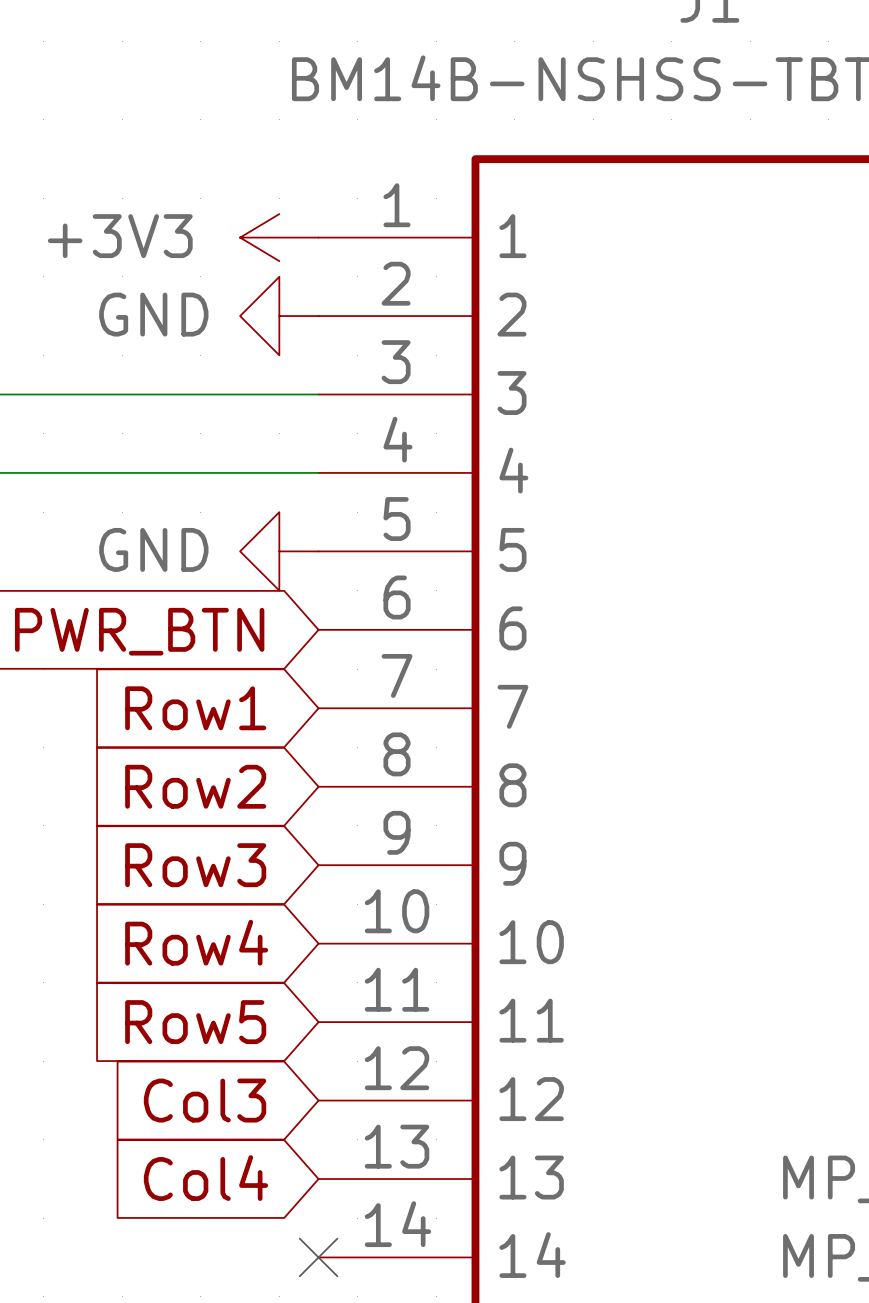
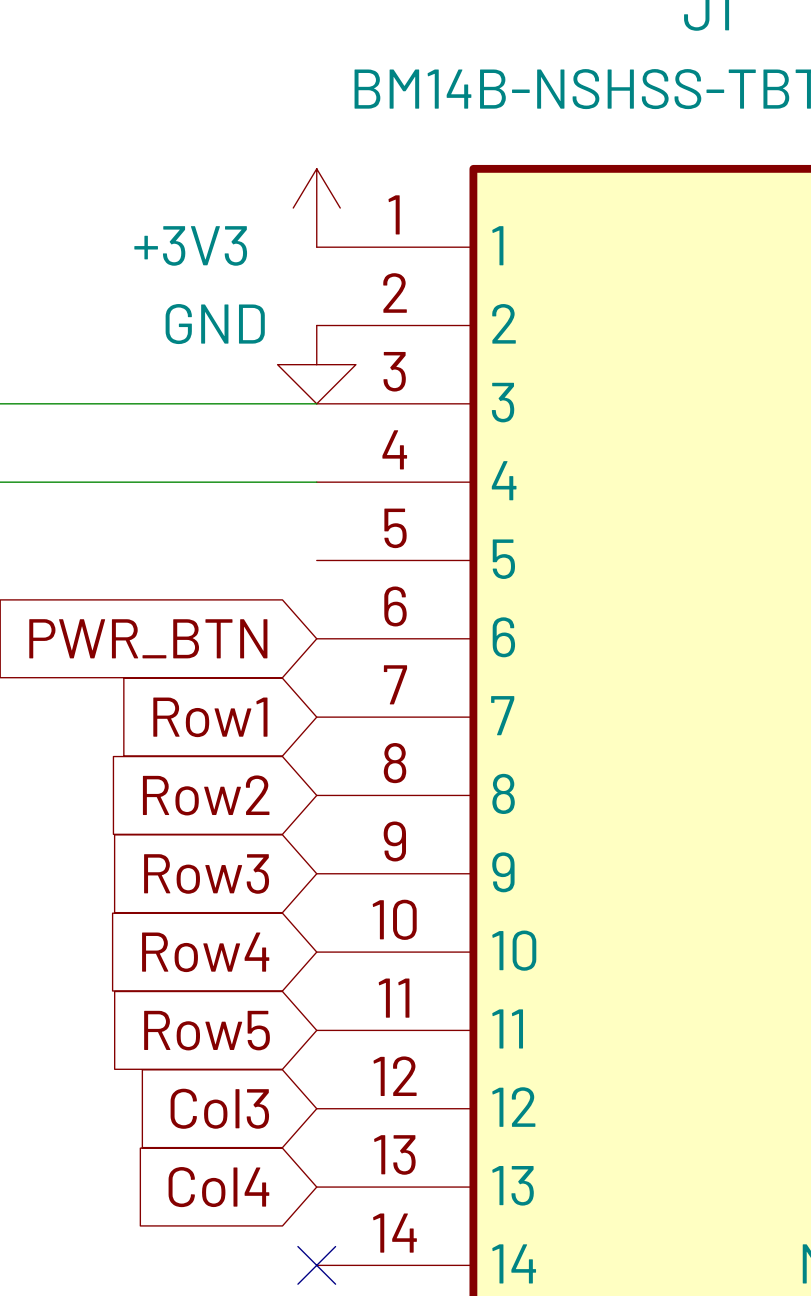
power symbol rotation: 0° (279, 237) -> 90° clockwise (316, 208)
power symbol position: +3V3 (279, 237) -> +3V3 (316, 208)
power symbol rotation: 0° (279, 316) -> 90° counterclockwise (316, 364)
power symbol position: GND (279, 316) -> GND (316, 364)
power symbol: GND (279, 551) -> none

